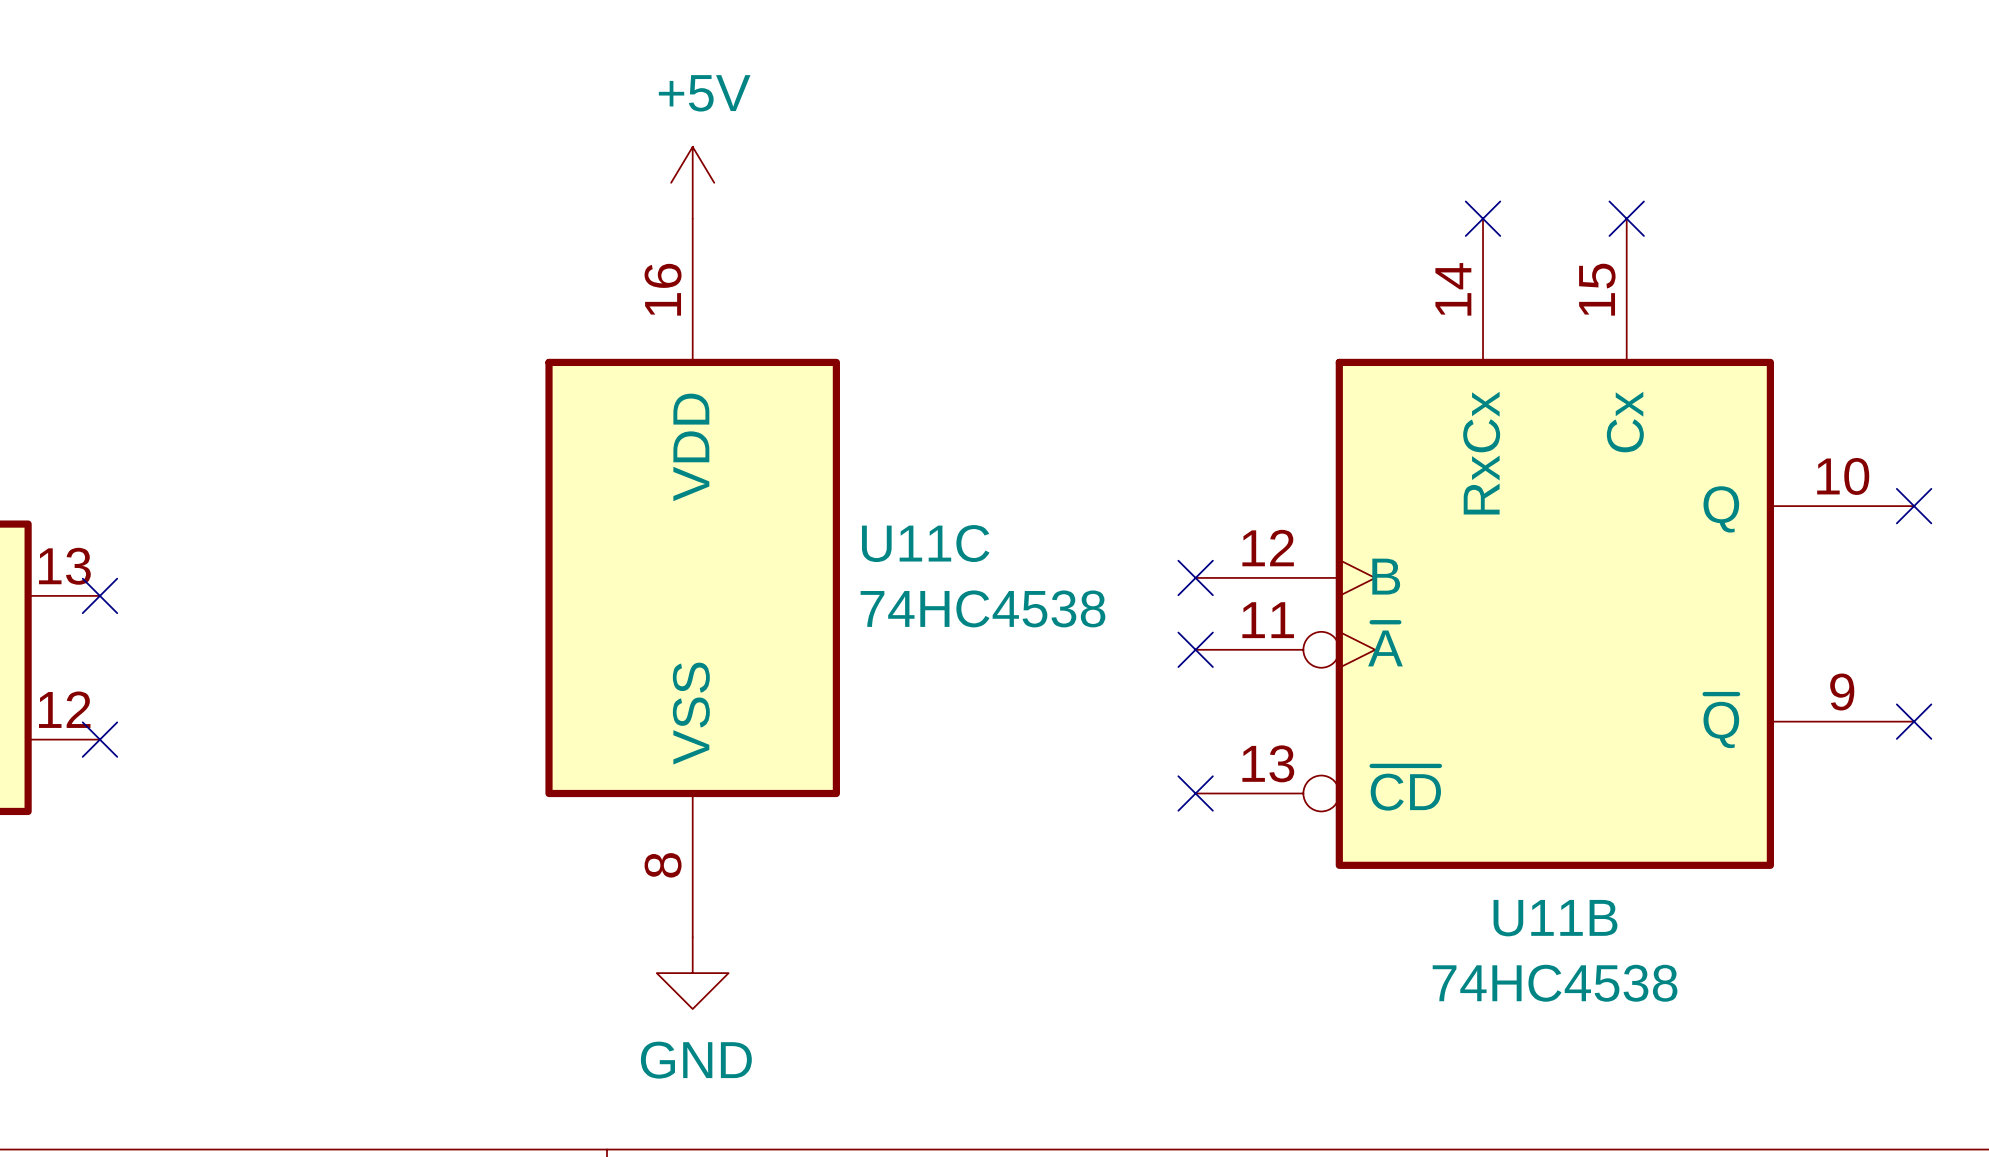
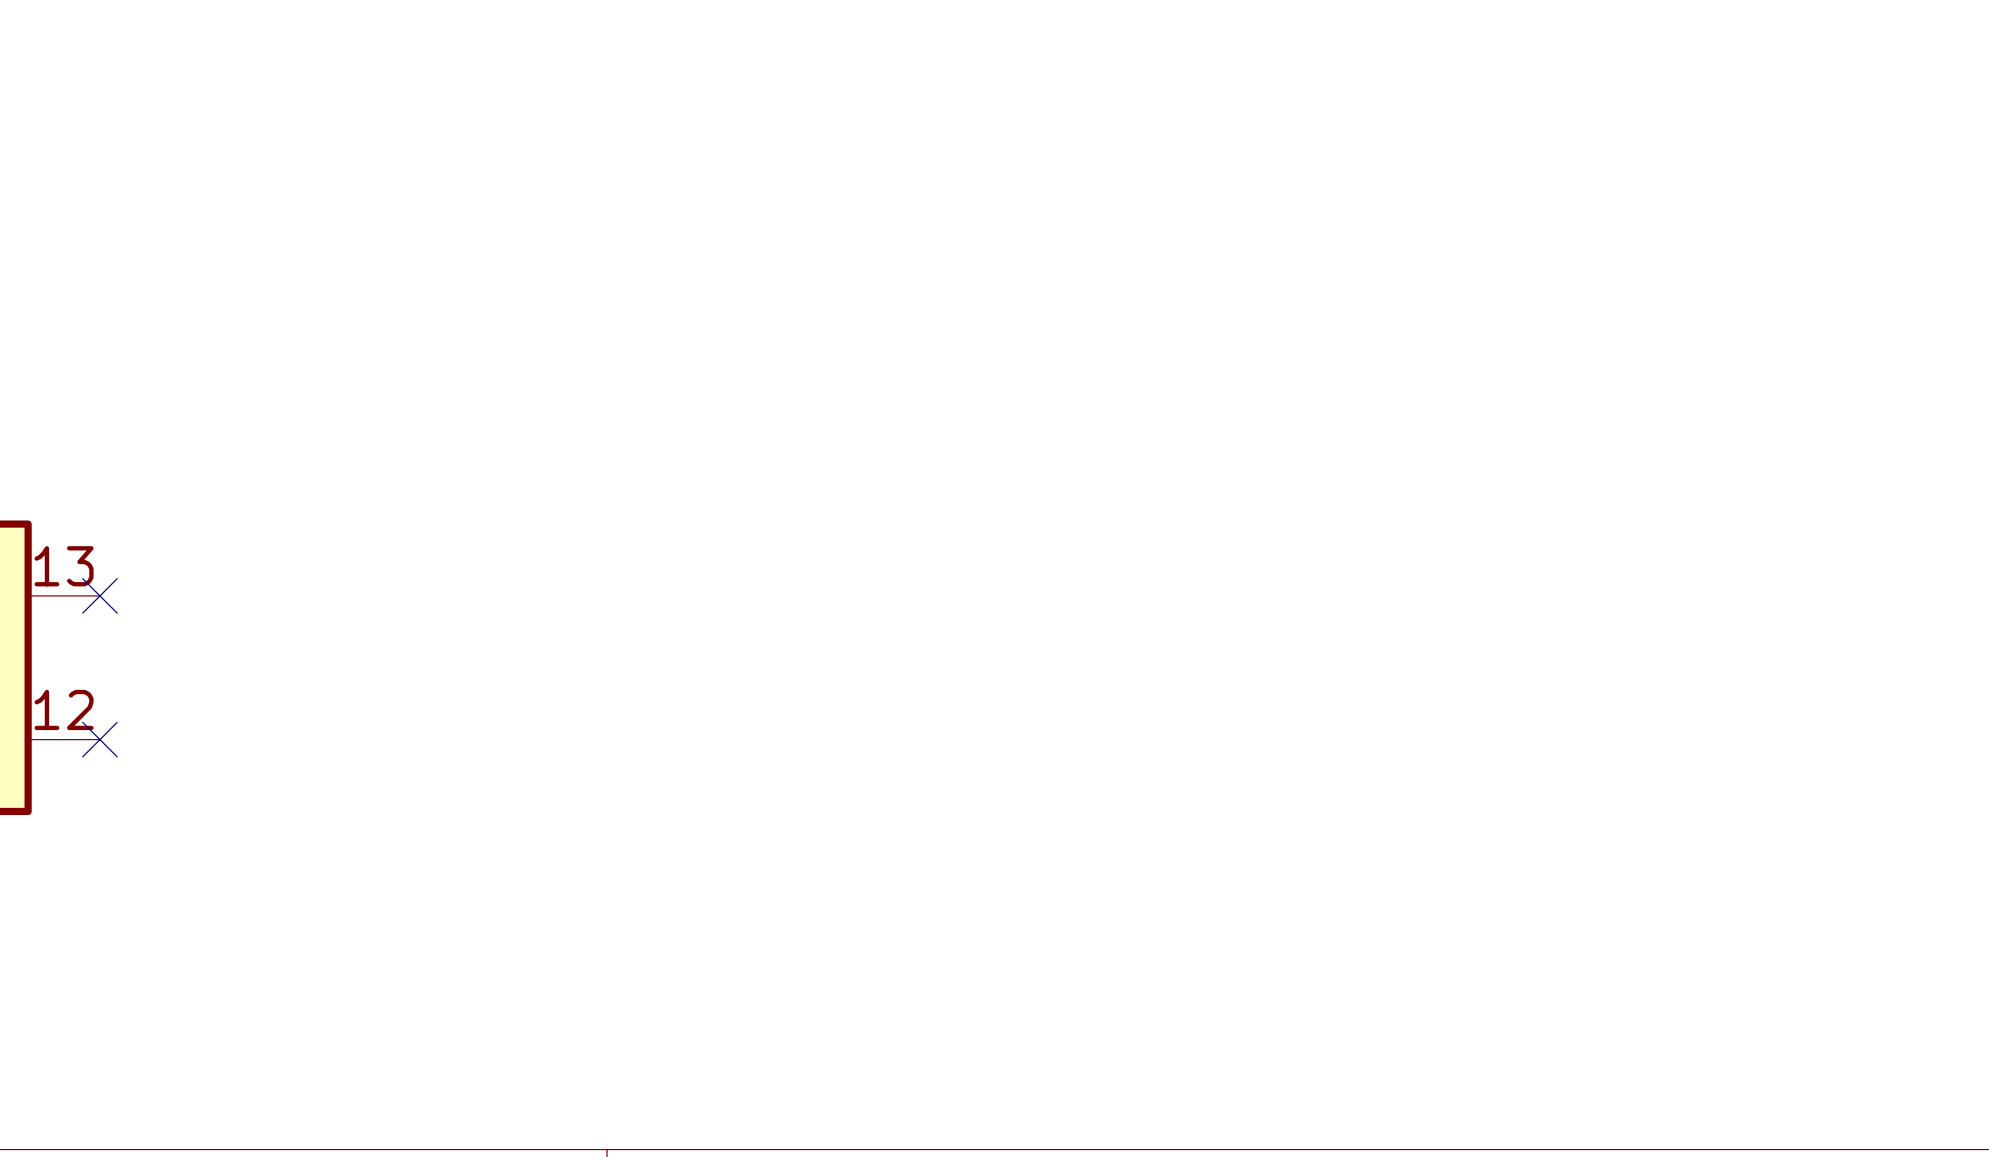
power symbol: +5V (692, 182) -> none
no-connect mark: (1483, 218) -> none
no-connect mark: (1626, 218) -> none
no-connect mark: (1914, 506) -> none
U11B: 74HC4538 (1554, 543) -> none
U11C: 74HC4538 (692, 577) -> none
no-connect mark: (1195, 577) -> none
no-connect mark: (1195, 649) -> none
no-connect mark: (1914, 721) -> none
no-connect mark: (1195, 793) -> none
power symbol: GND (692, 973) -> none

